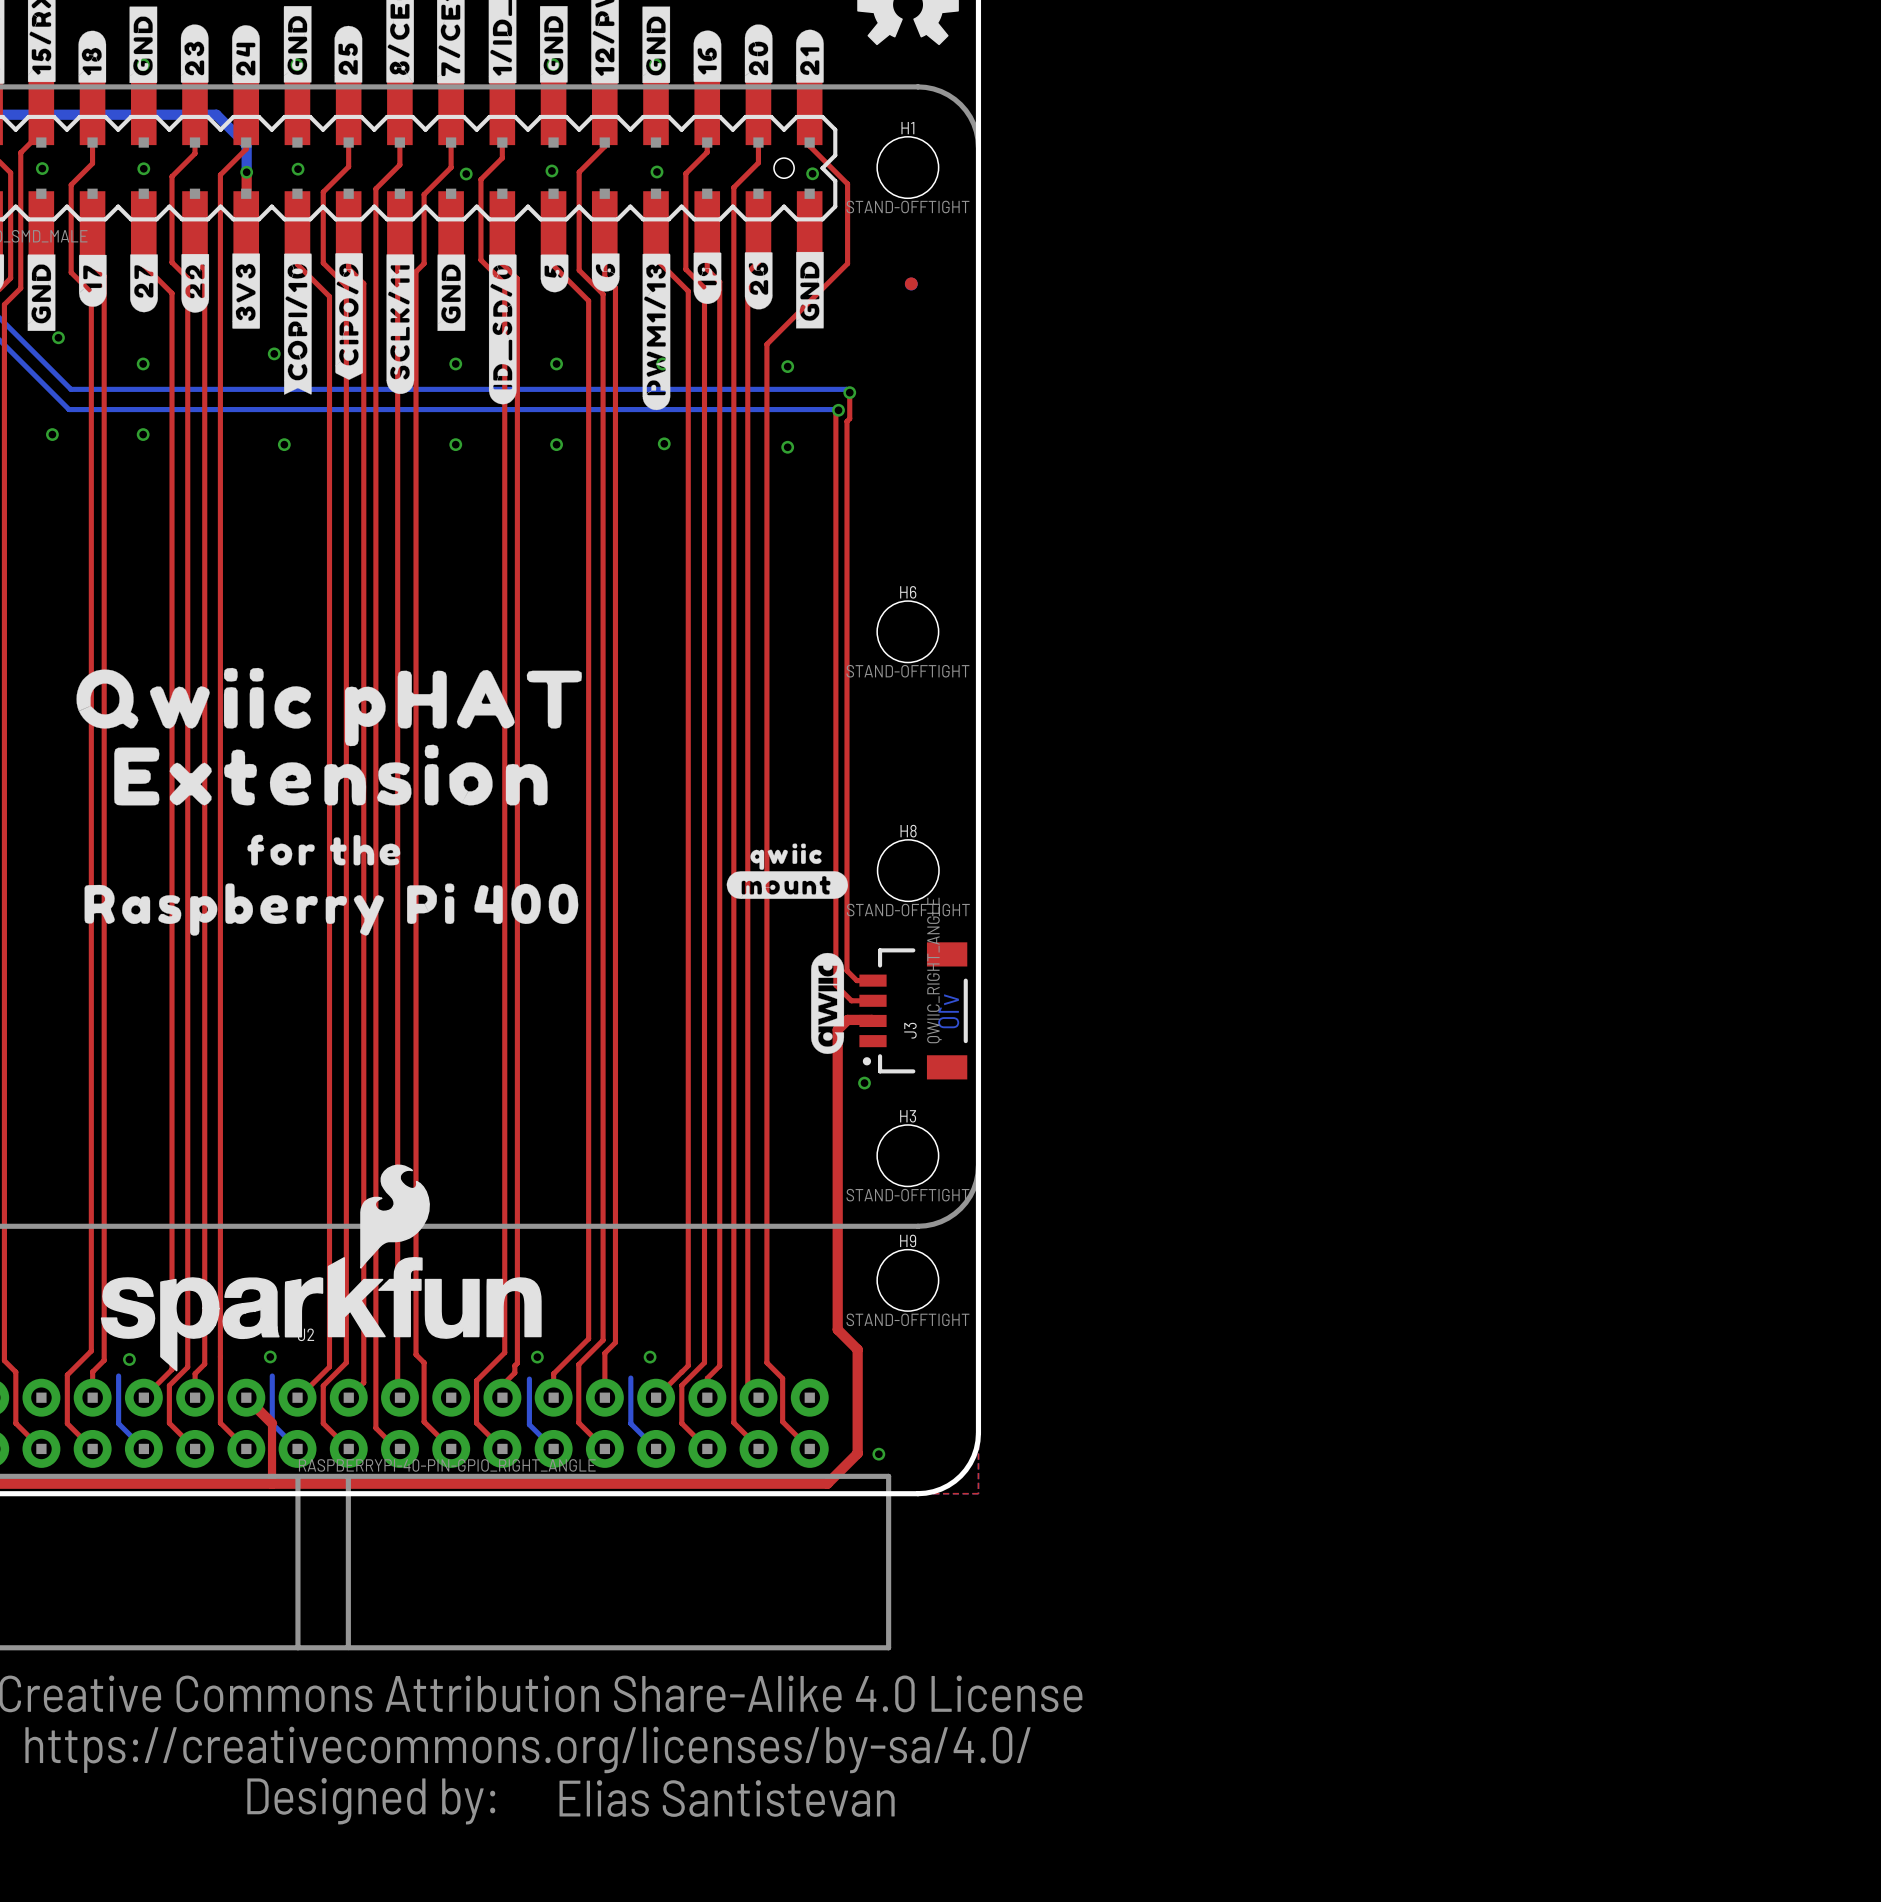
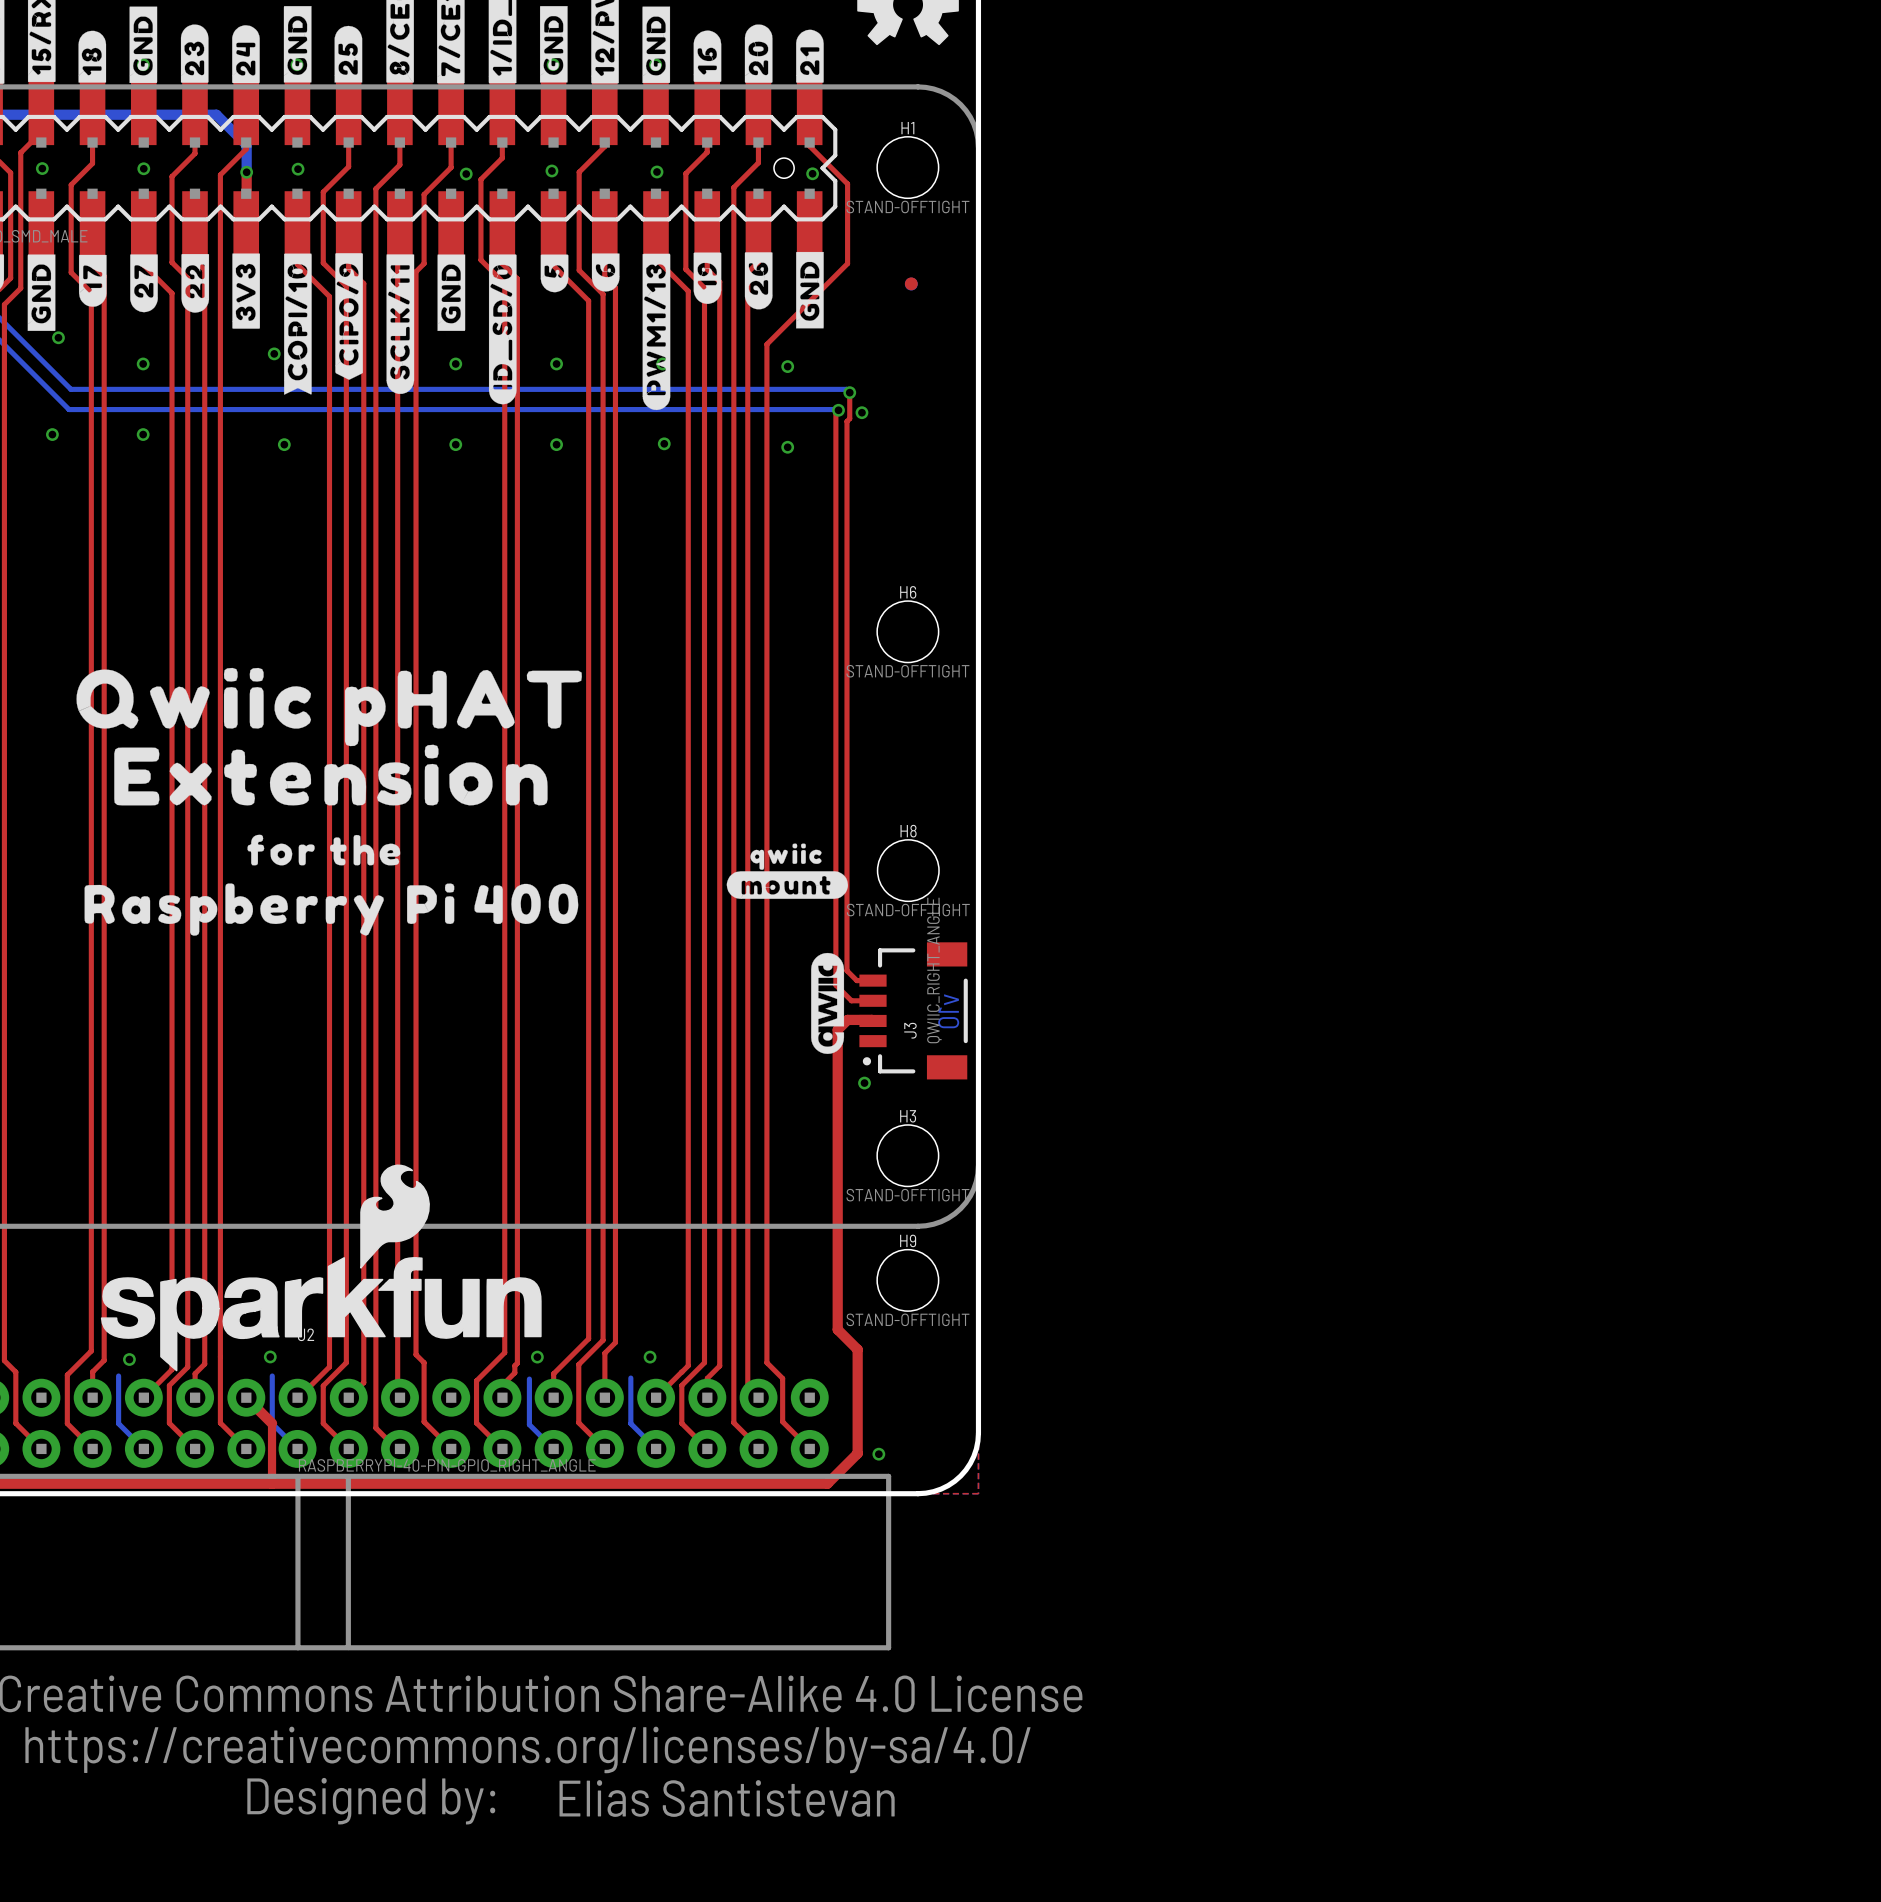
via: none -> (861, 412)

